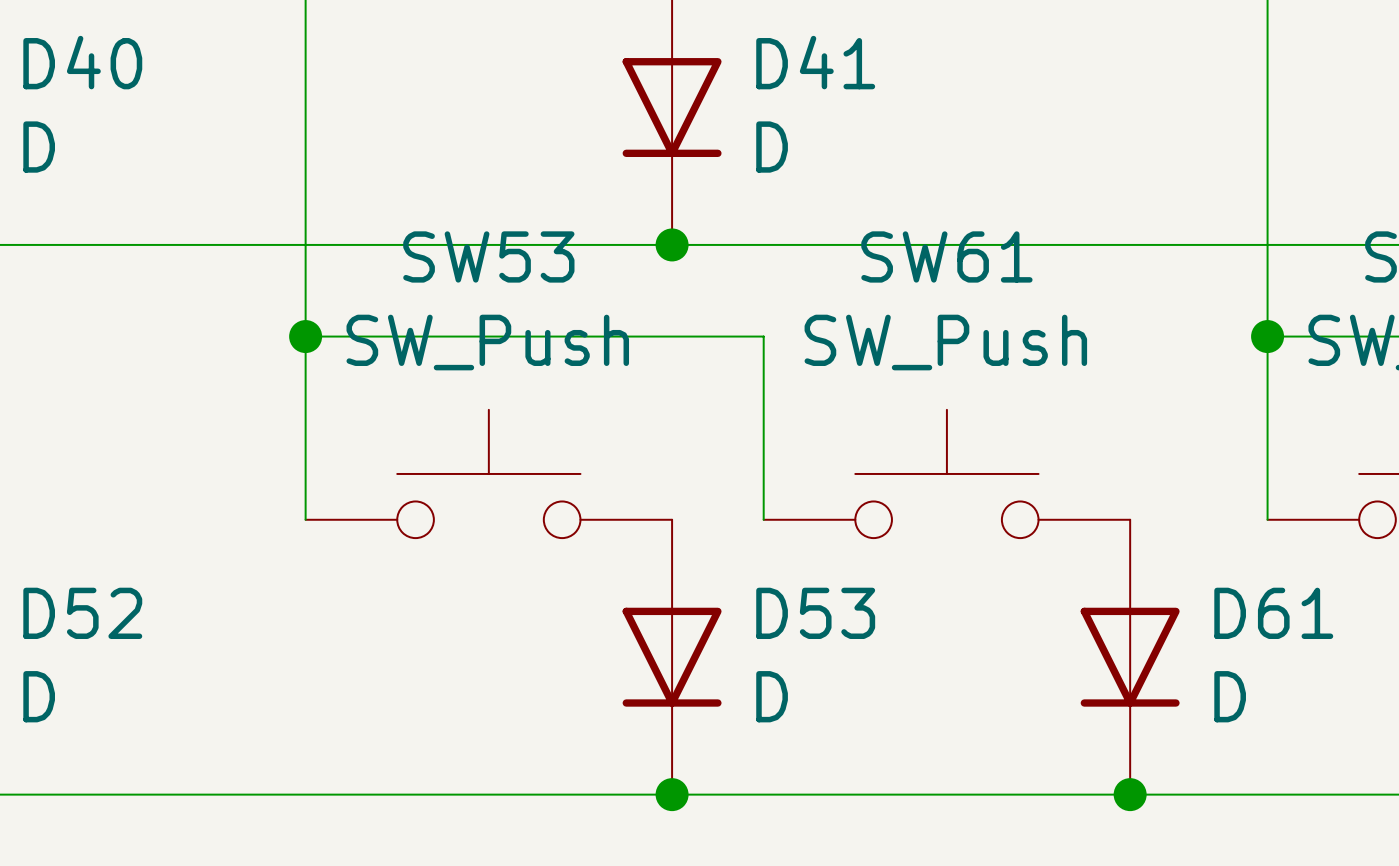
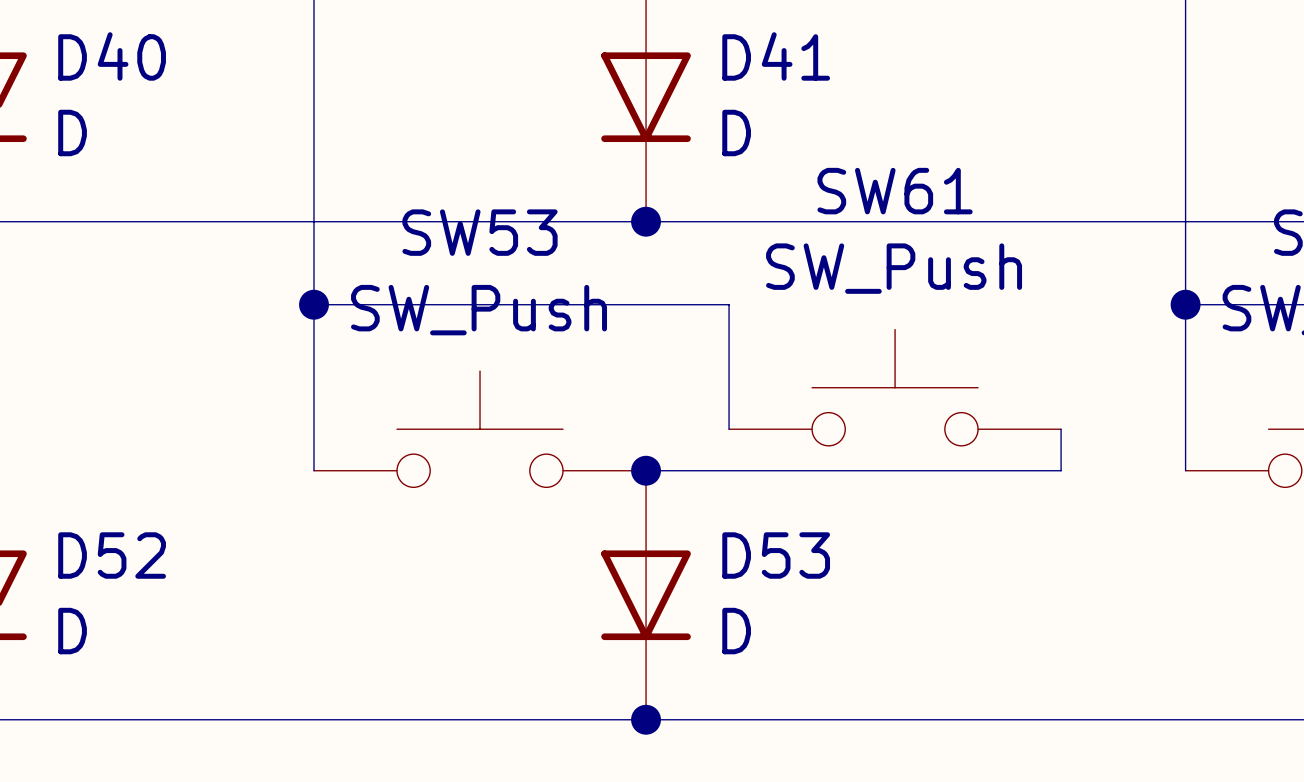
wire: (763, 473) (763, 519) -> none
SW61 position: (946, 473) -> (895, 387)
wire: none -> (1061, 429) (1061, 470) (646, 470)
junction: none -> (646, 470)
D61: D (1130, 657) -> none
junction: (1130, 794) -> none

